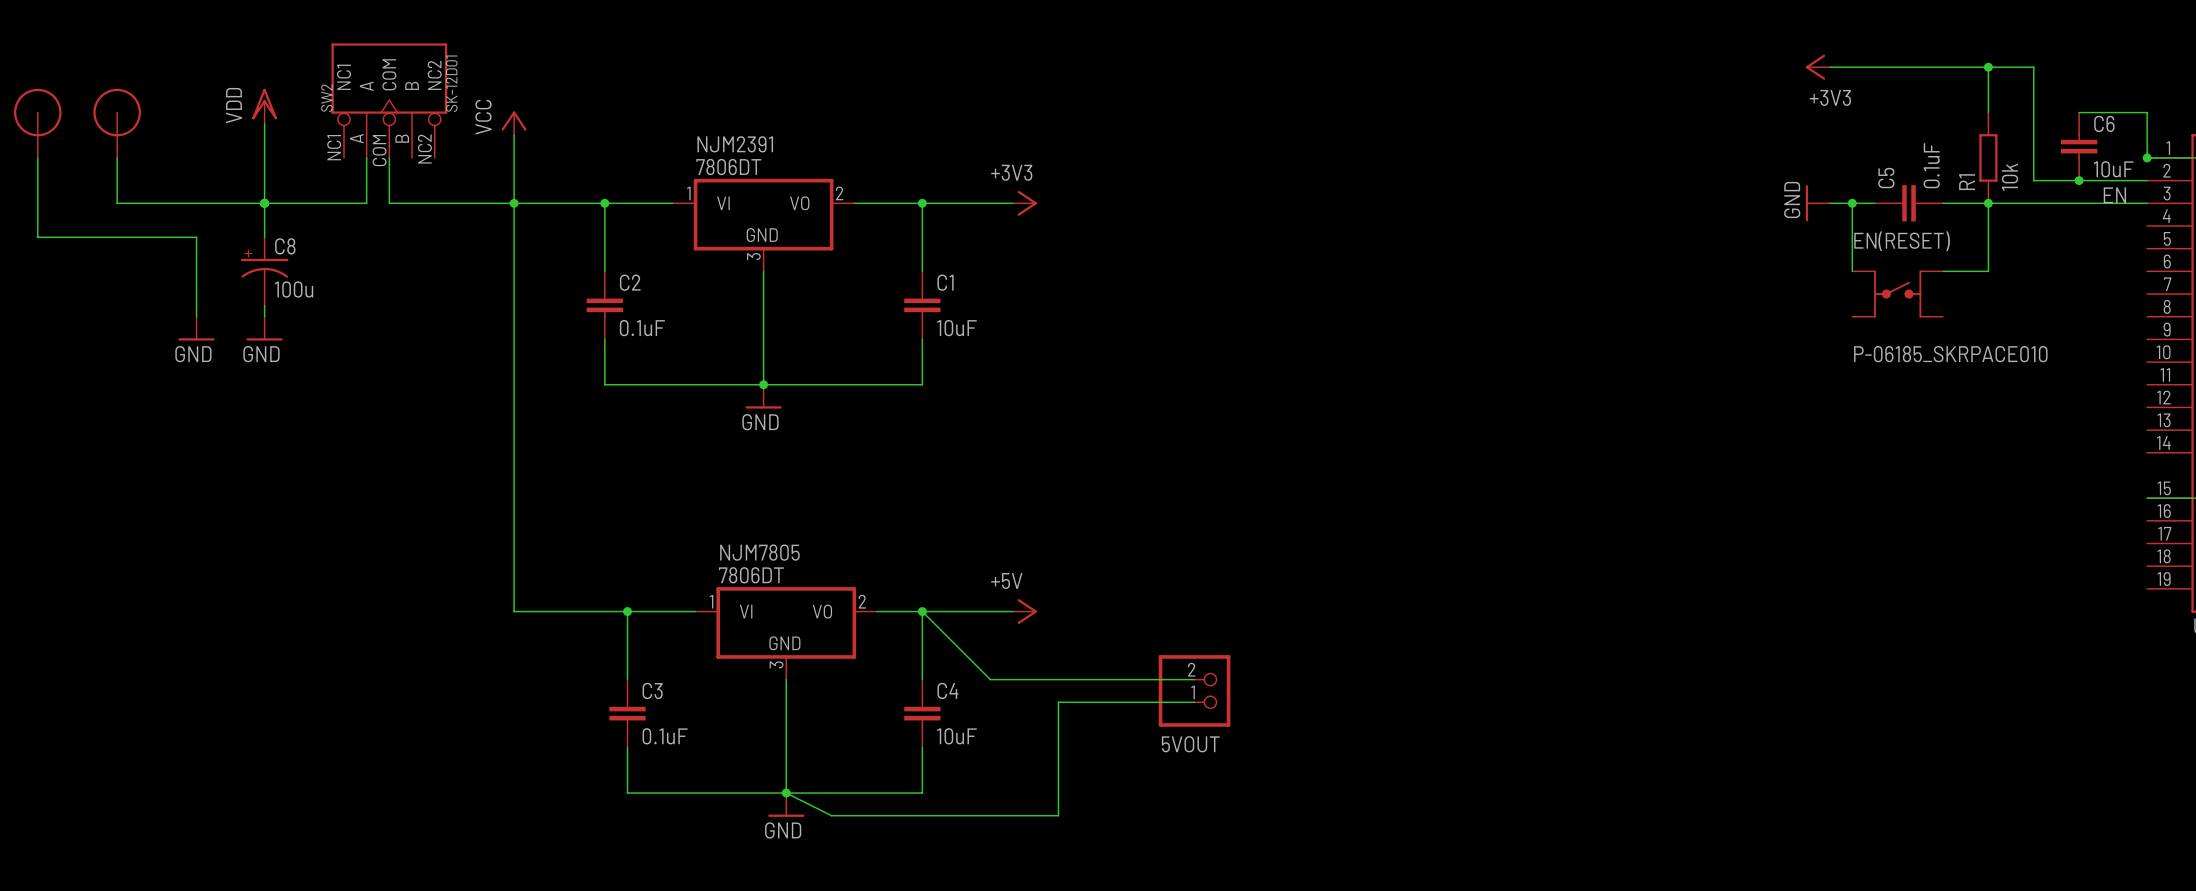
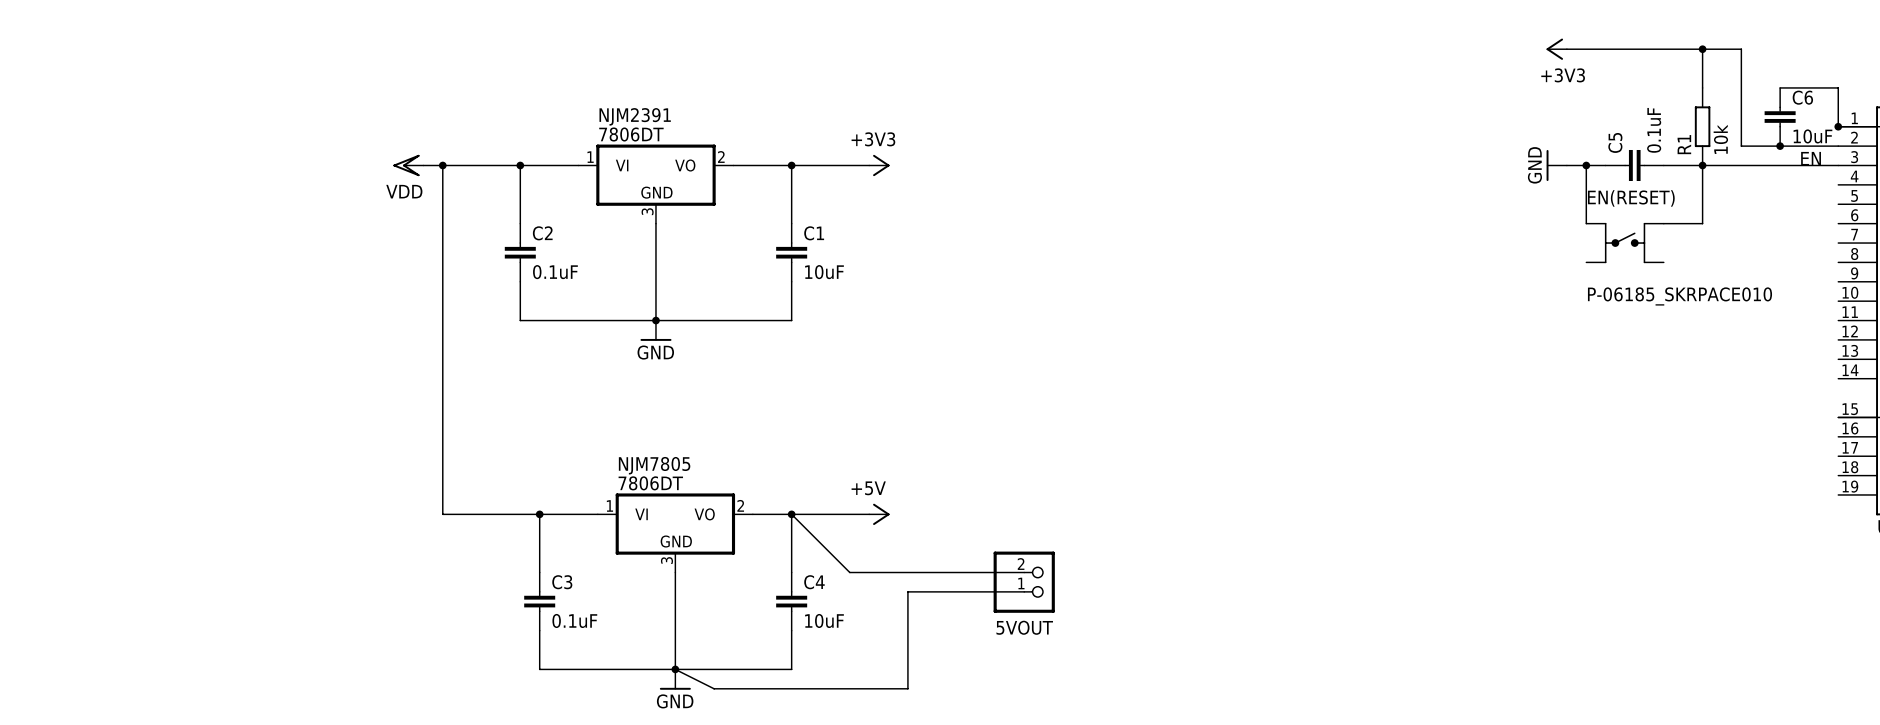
SW2: SK-12D01 (389, 100) -> none
power symbol: VDD (264, 106) -> none
part: (37, 123) -> none
part: (117, 123) -> none
wire: (264, 123) (264, 237) -> none
power symbol: VCC (514, 123) -> none
wire: (514, 135) (514, 203) -> none
wire: (37, 157) (37, 237) (196, 237) (196, 316) -> none
wire: (117, 157) (117, 203) (366, 203) (366, 157) -> none
wire: (389, 157) (389, 203) (491, 203) -> none
junction: (264, 203) -> none
power symbol: none -> VDD (408, 165)
C8: 100u (264, 271) -> none
wire: (264, 305) (264, 316) -> none
power symbol: GND (196, 328) -> none
power symbol: GND (264, 328) -> none

